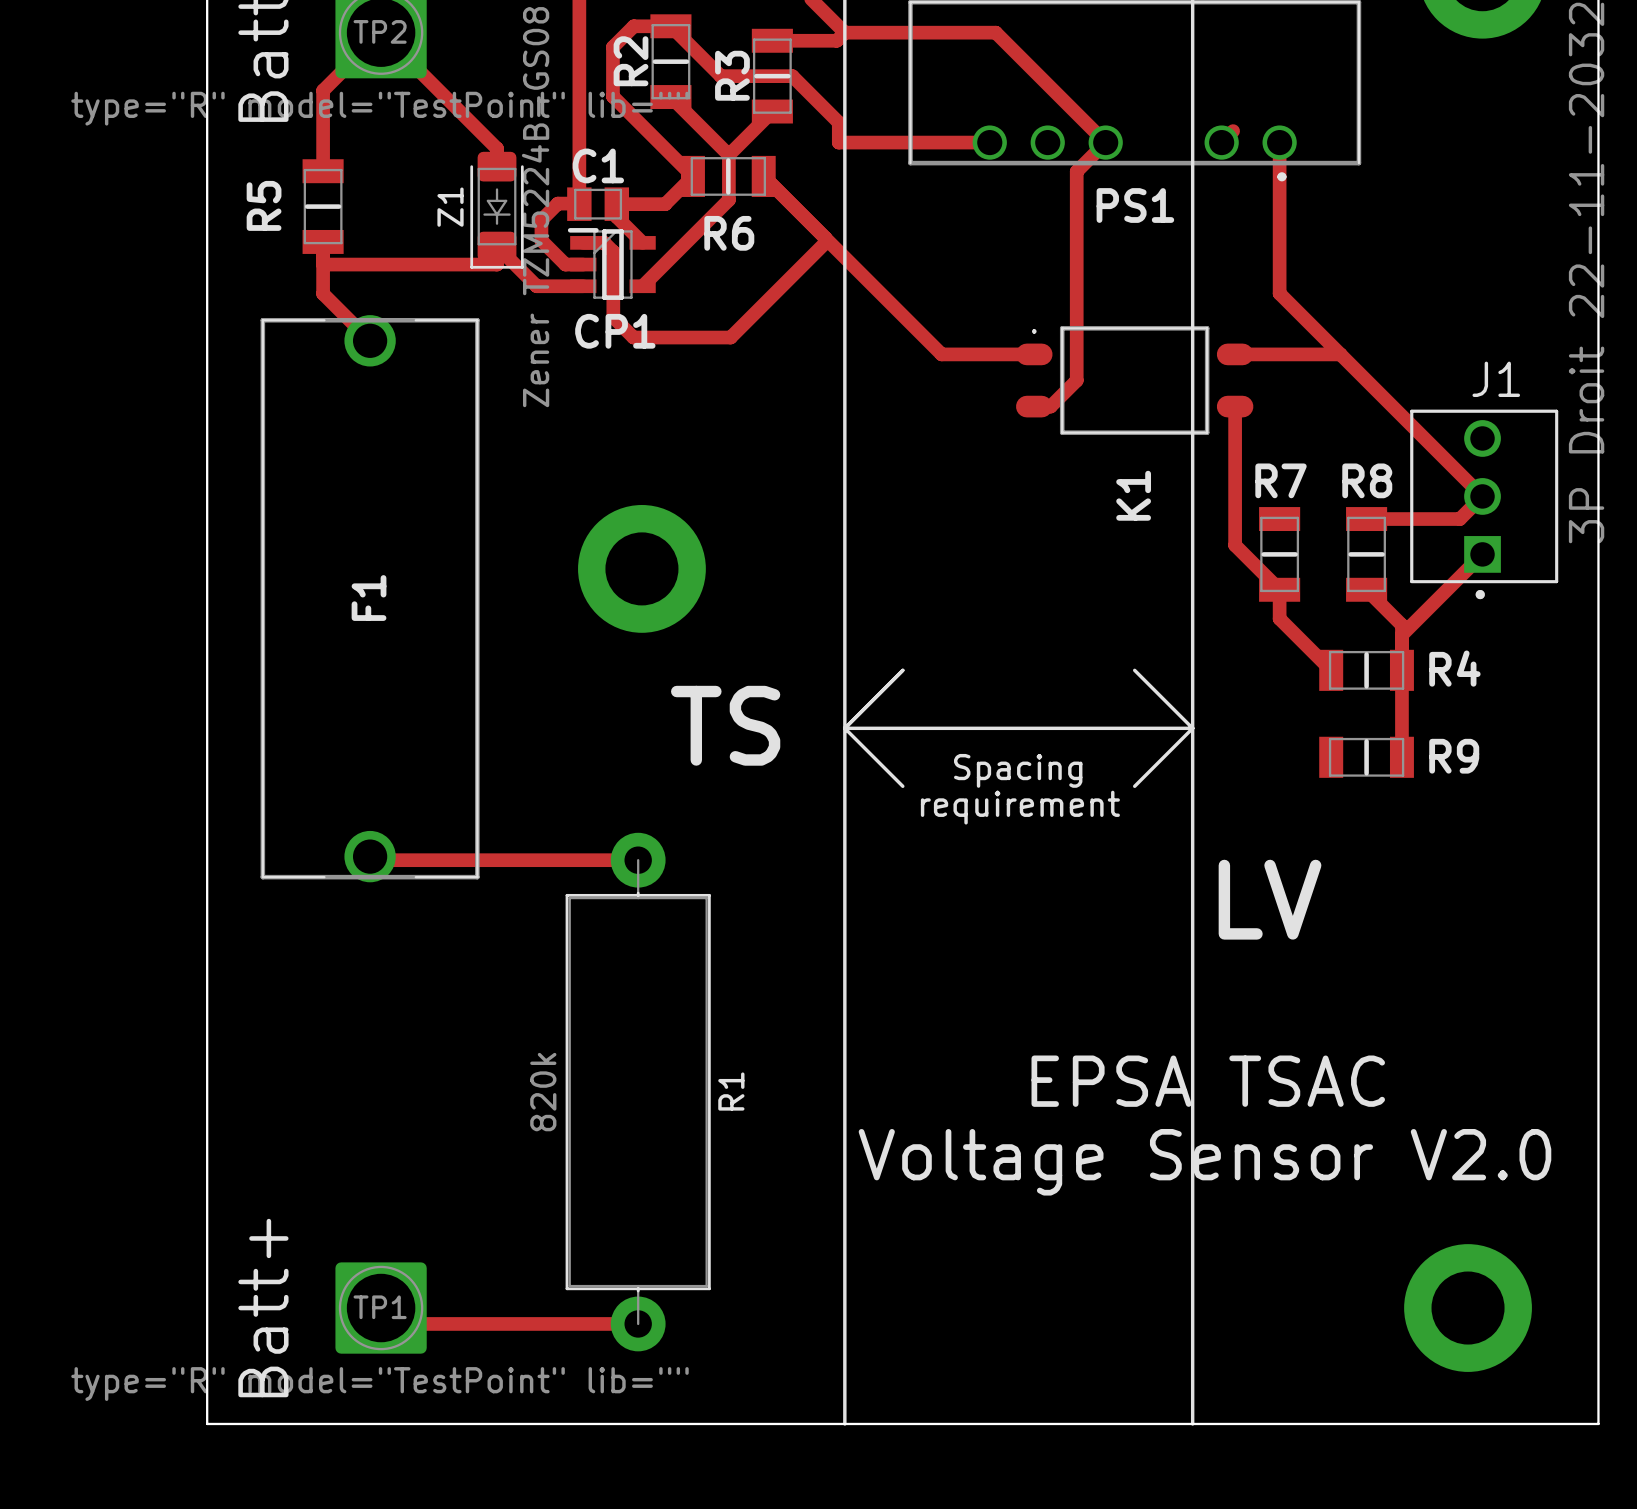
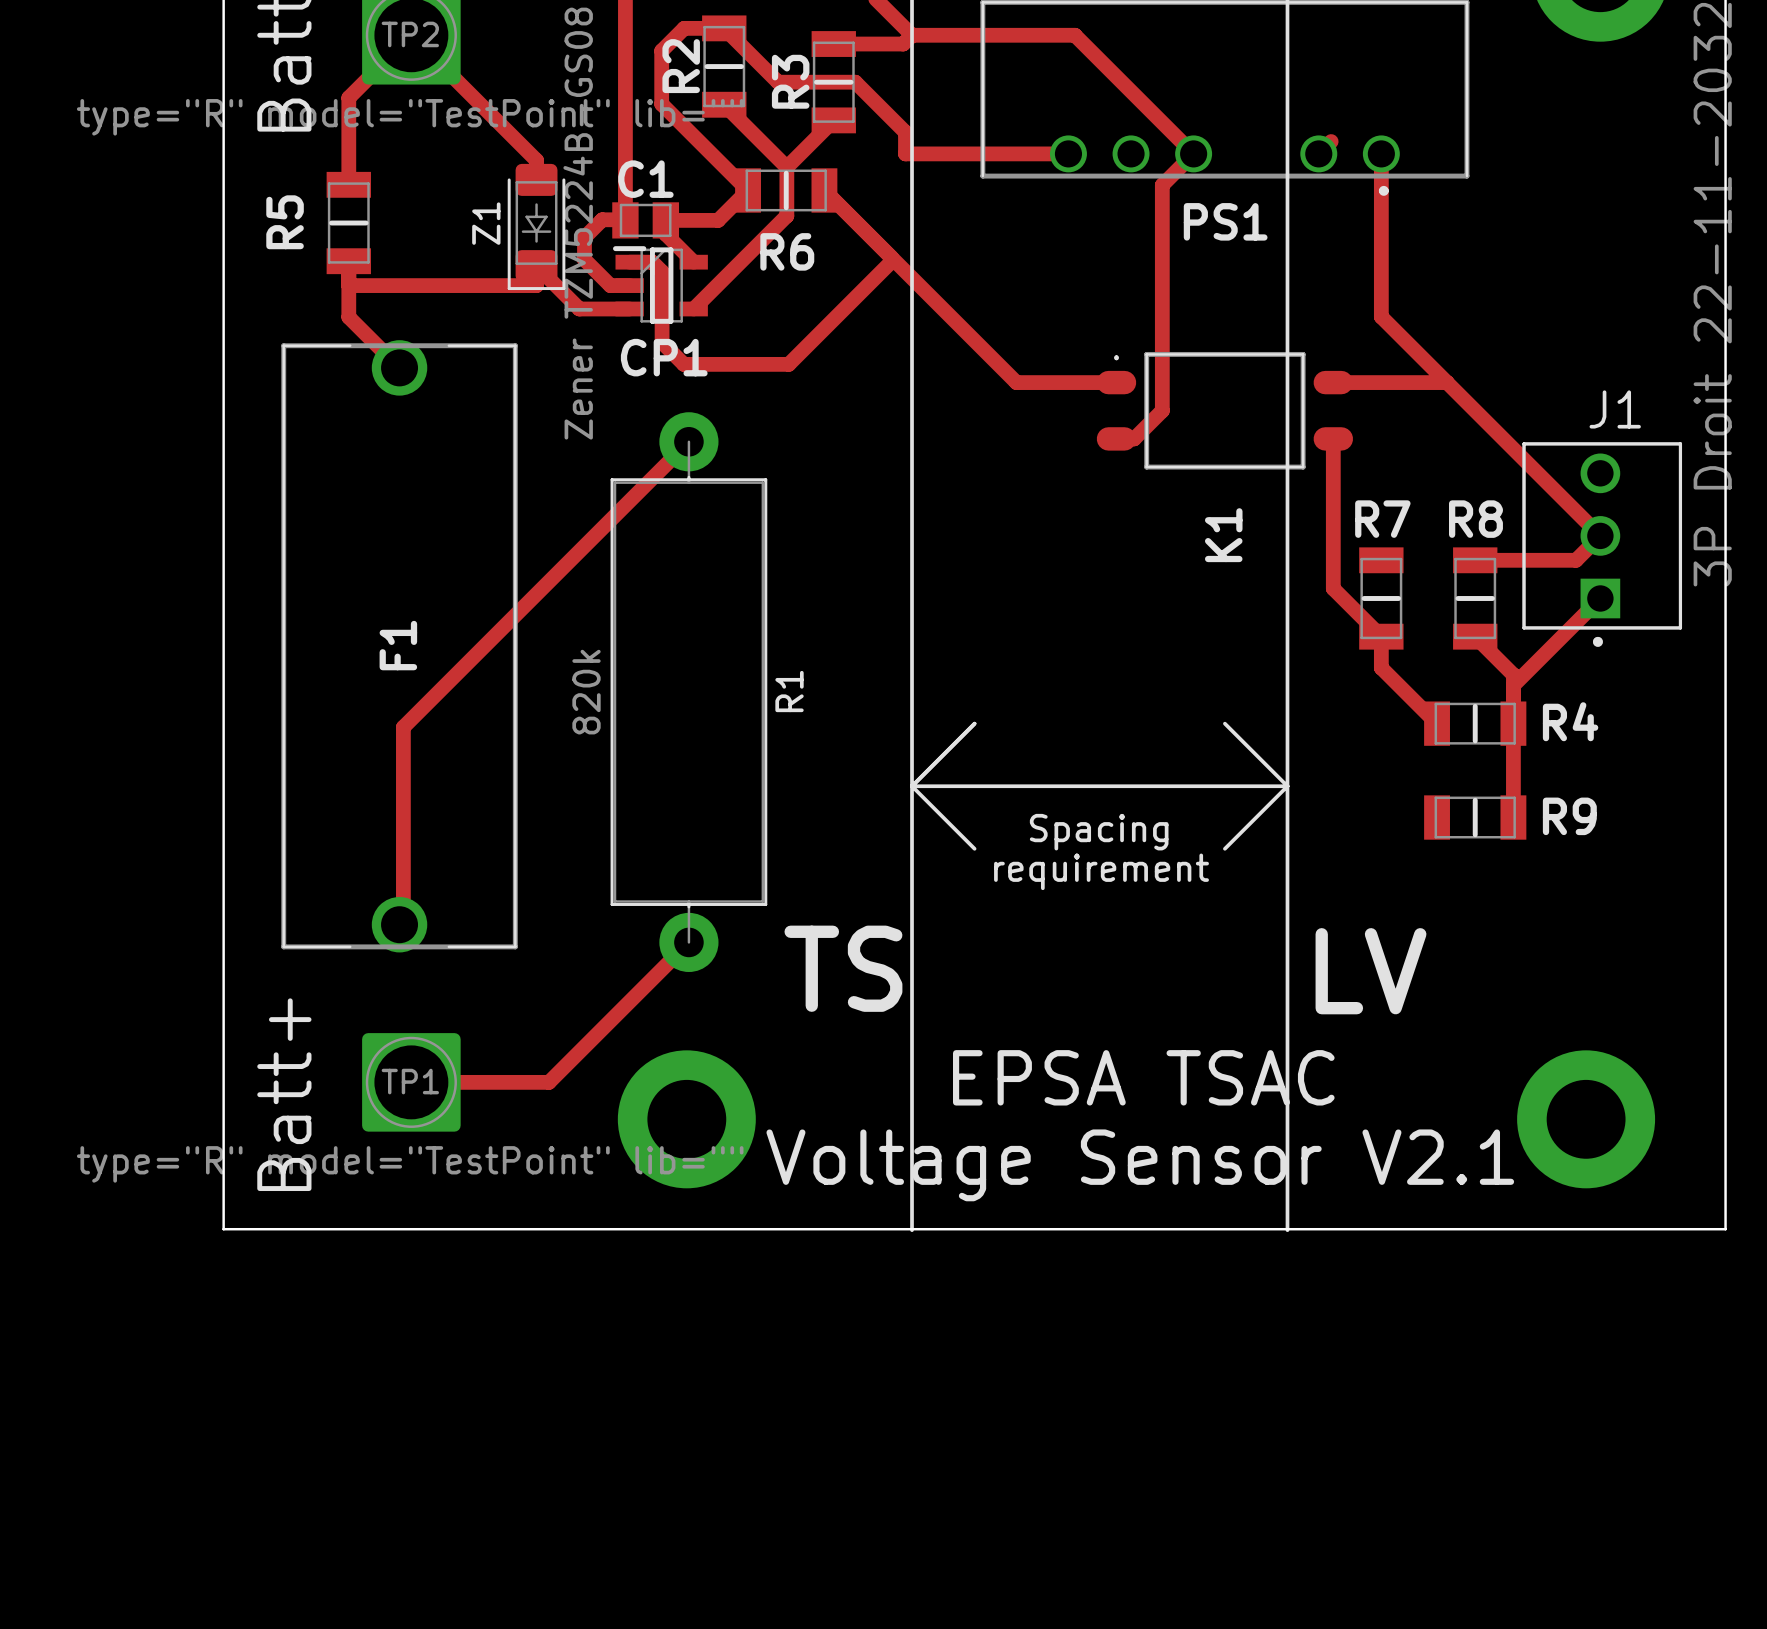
part: (641, 568) -> none
text position: TS (725, 725) -> TS (843, 968)
top track: (373, 860) (638, 860) -> (403, 928) (403, 727) (688, 441)
top track: none -> (688, 942) (548, 1082) (411, 1082)
part: none -> (686, 1119)
text position: EPSA TSAC (1208, 1081) -> EPSA TSAC (1143, 1077)
R1 position: (638, 1092) -> (688, 692)
board edge: (207, 1138) (207, 1423) (1598, 1423) (1598, 1138) -> (223, 1229) (1725, 1229)
line: (844, 1139) (844, 1423) -> none
line: (1192, 1139) (1192, 1423) -> none
text: Voltage Sensor V2.0 (1204, 1162) -> Voltage Sensor V2.1 (1140, 1165)
text position: Batt+ (263, 1308) -> Batt+ (284, 1094)
TP1 position: (381, 1308) -> (411, 1082)
part position: (1468, 1308) -> (1586, 1119)
top track: (397, 1323) (638, 1323) -> none

